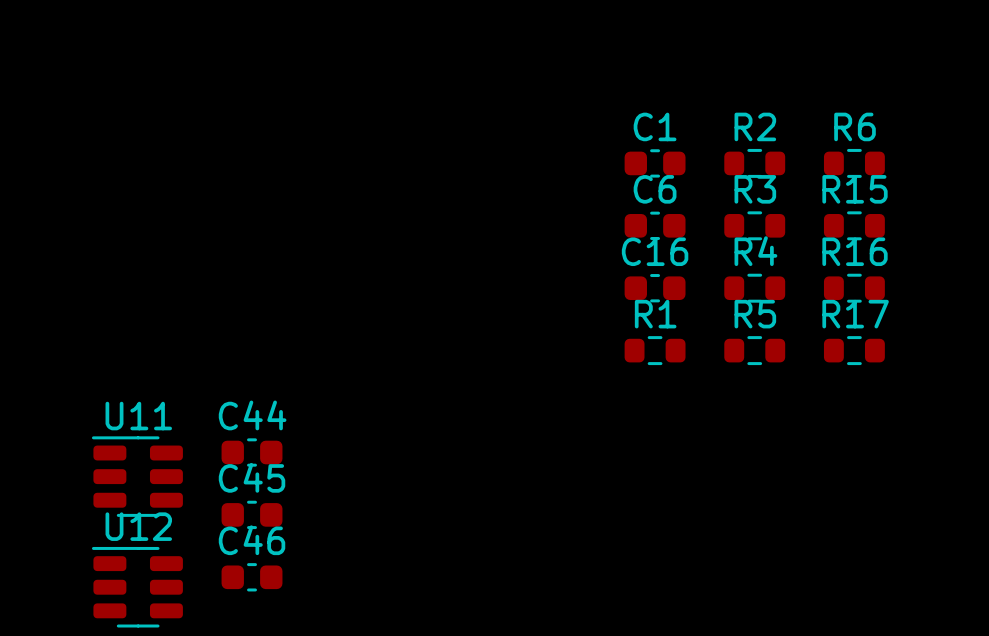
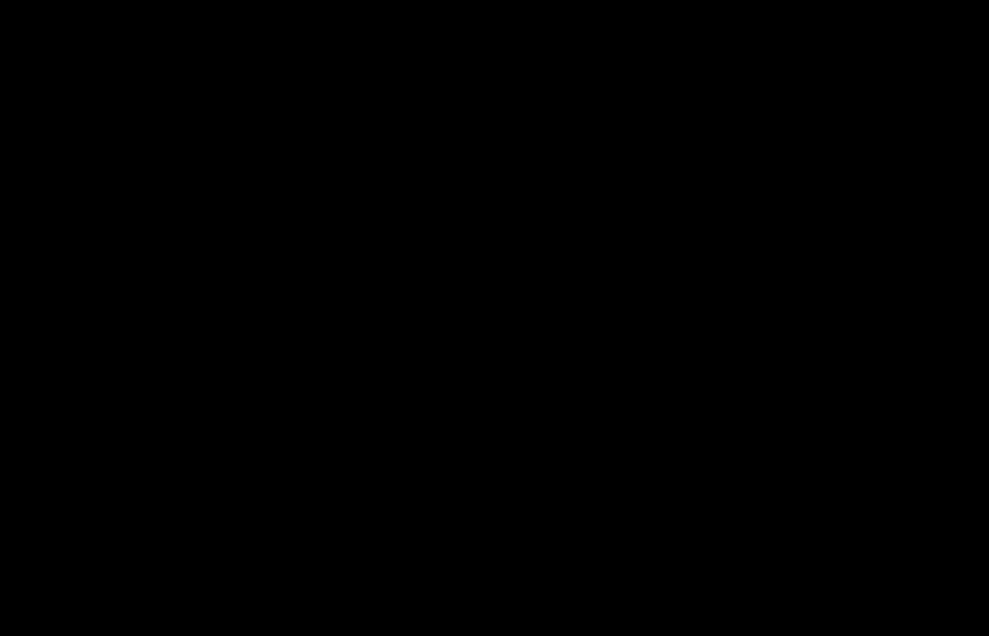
C1: (655, 163) -> none
R2: (754, 163) -> none
R6: (854, 163) -> none
C6: (655, 225) -> none
R3: (754, 225) -> none
R15: (854, 225) -> none
C16: (655, 288) -> none
R4: (754, 288) -> none
R16: (854, 288) -> none
R1: (655, 350) -> none
R5: (754, 350) -> none
R17: (854, 350) -> none
C44: (252, 452) -> none
U11: (137, 476) -> none
C45: (252, 514) -> none
C46: (252, 577) -> none
U12: (137, 587) -> none

